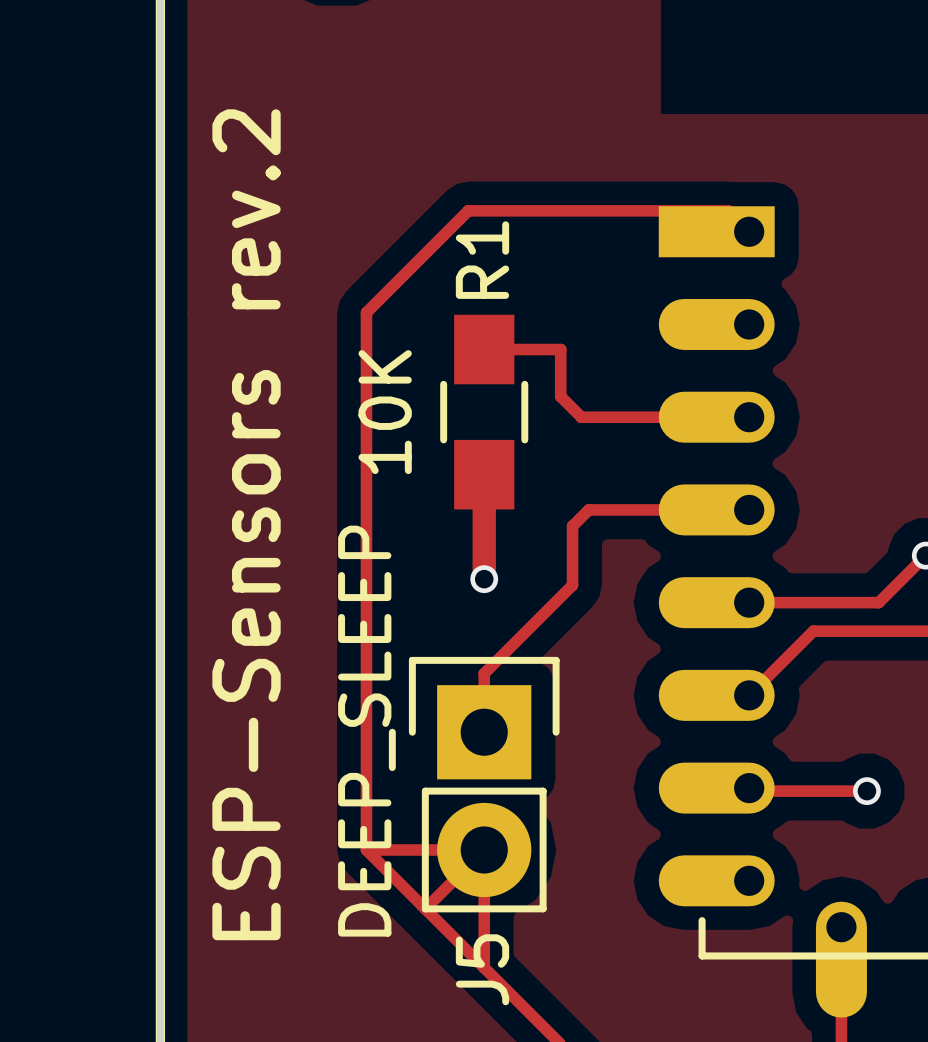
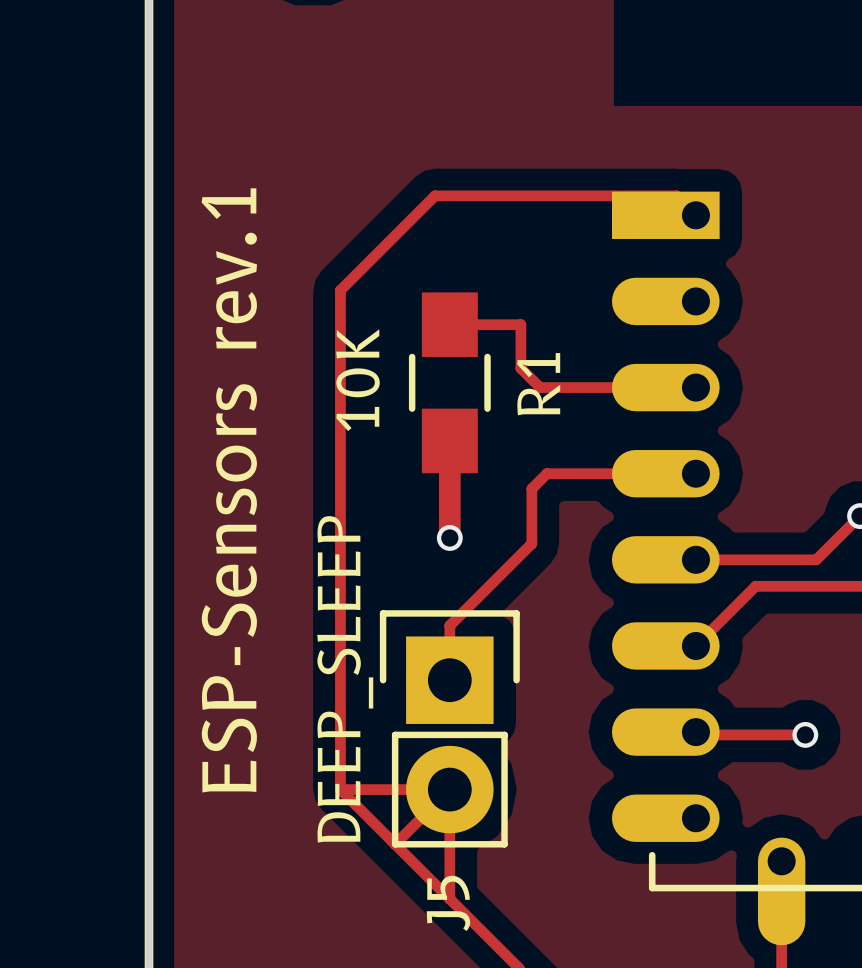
R1 name position: R1 (482, 260) -> R1 (538, 384)
text: ESP-Sensors rev.2 (246, 524) -> ESP-Sensors rev.1 (229, 490)

